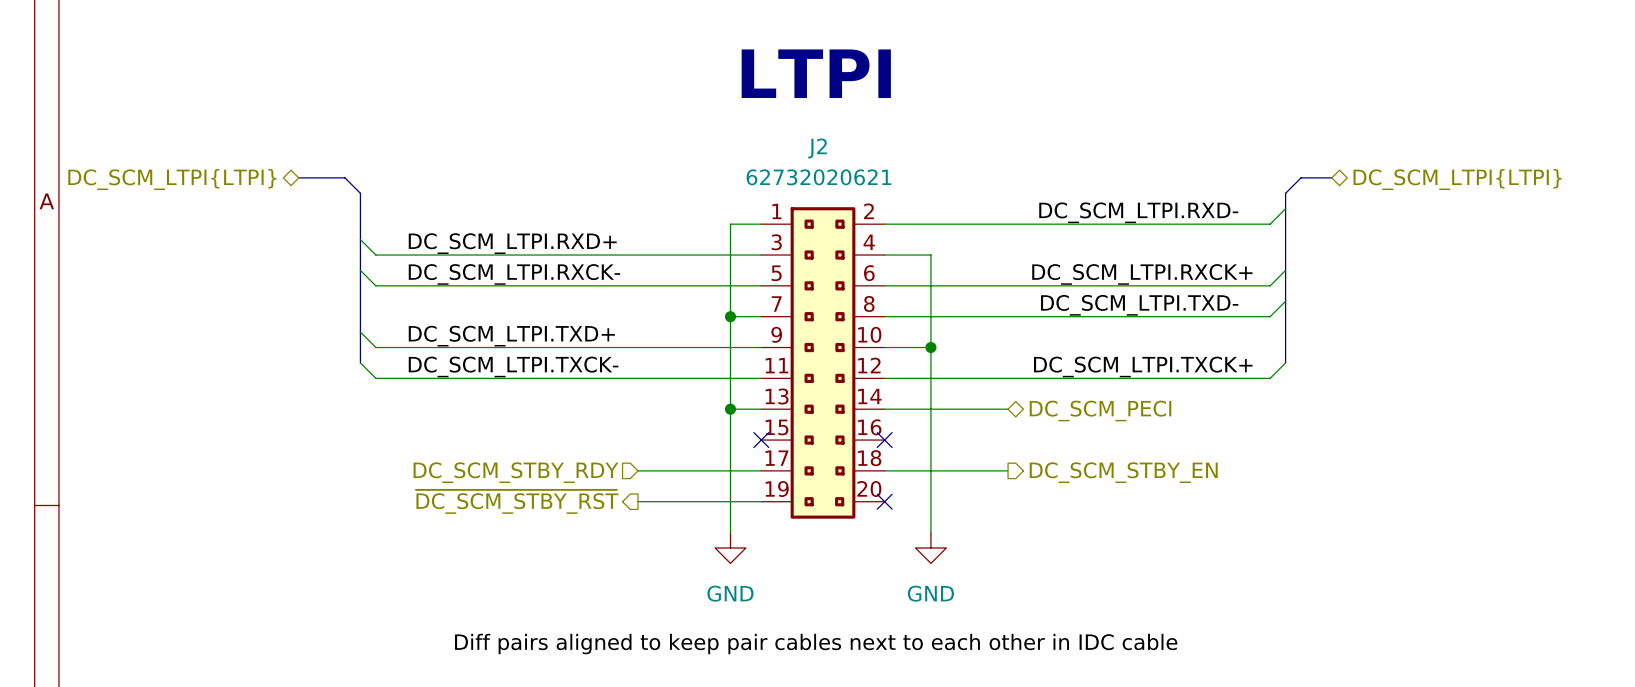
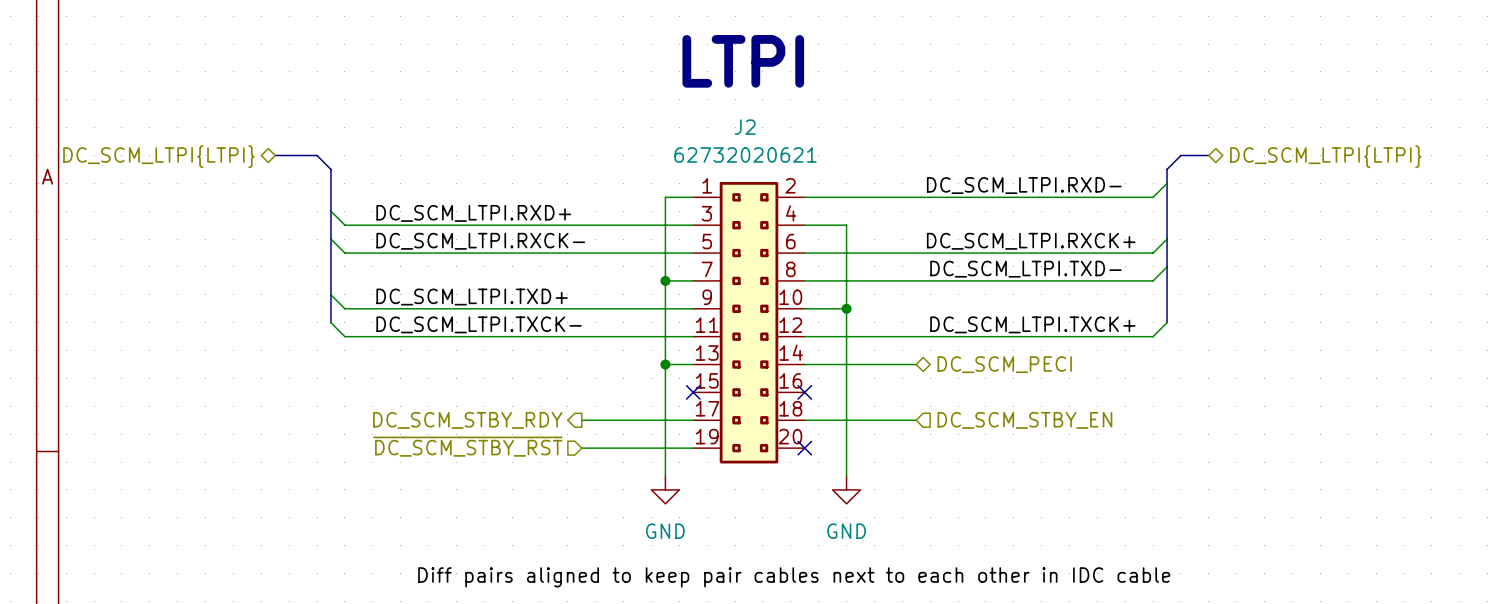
hierarchical label shape: input (516, 472) -> output (467, 420)
hierarchical label shape: output (1123, 472) -> input (1024, 420)
hierarchical label shape: output (517, 501) -> input (467, 446)

